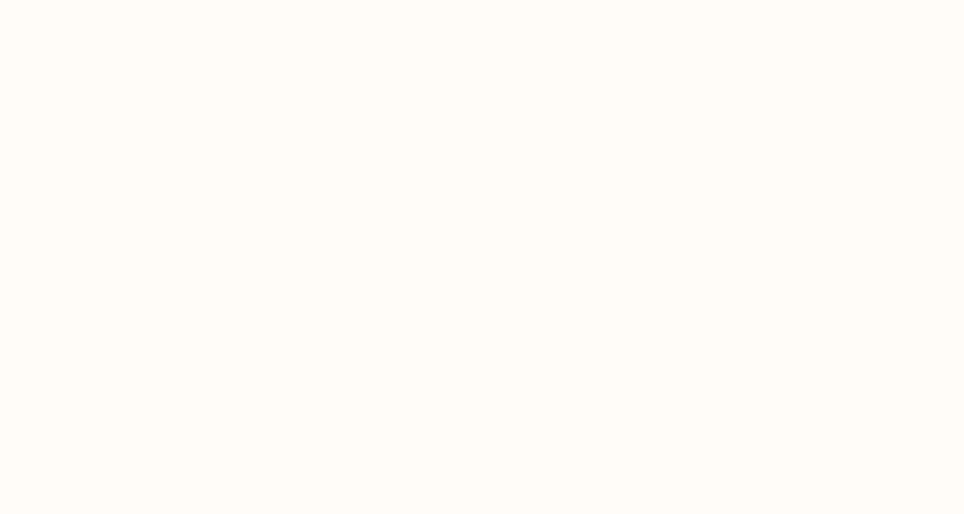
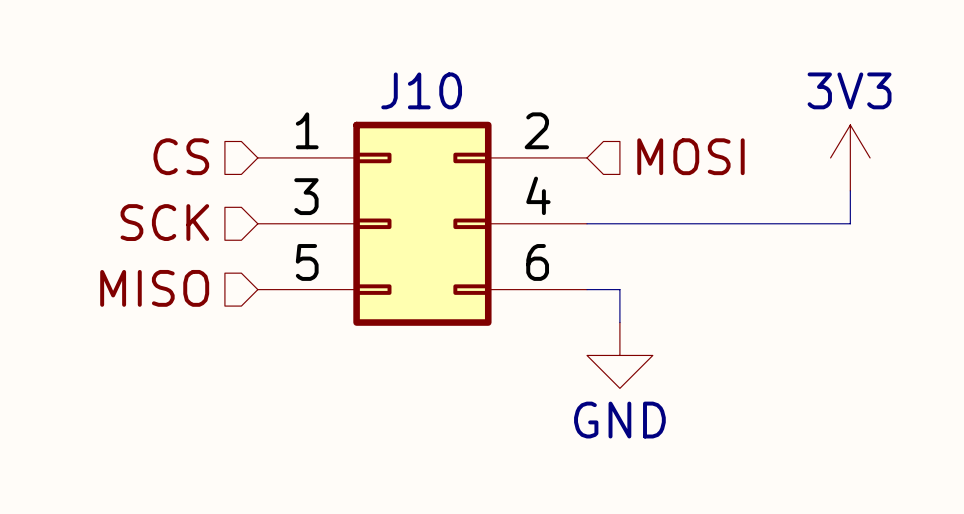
hierarchical label: none -> CS (181, 156)
hierarchical label: none -> MOSI (690, 156)
power symbol: none -> 3V3 (850, 157)
wire: none -> (850, 190) (850, 223) (587, 223)
hierarchical label: none -> SCK (164, 222)
J10: none -> (422, 223)
hierarchical label: none -> MISO (154, 288)
wire: none -> (587, 289) (619, 289) (619, 322)
power symbol: none -> GND (619, 355)

